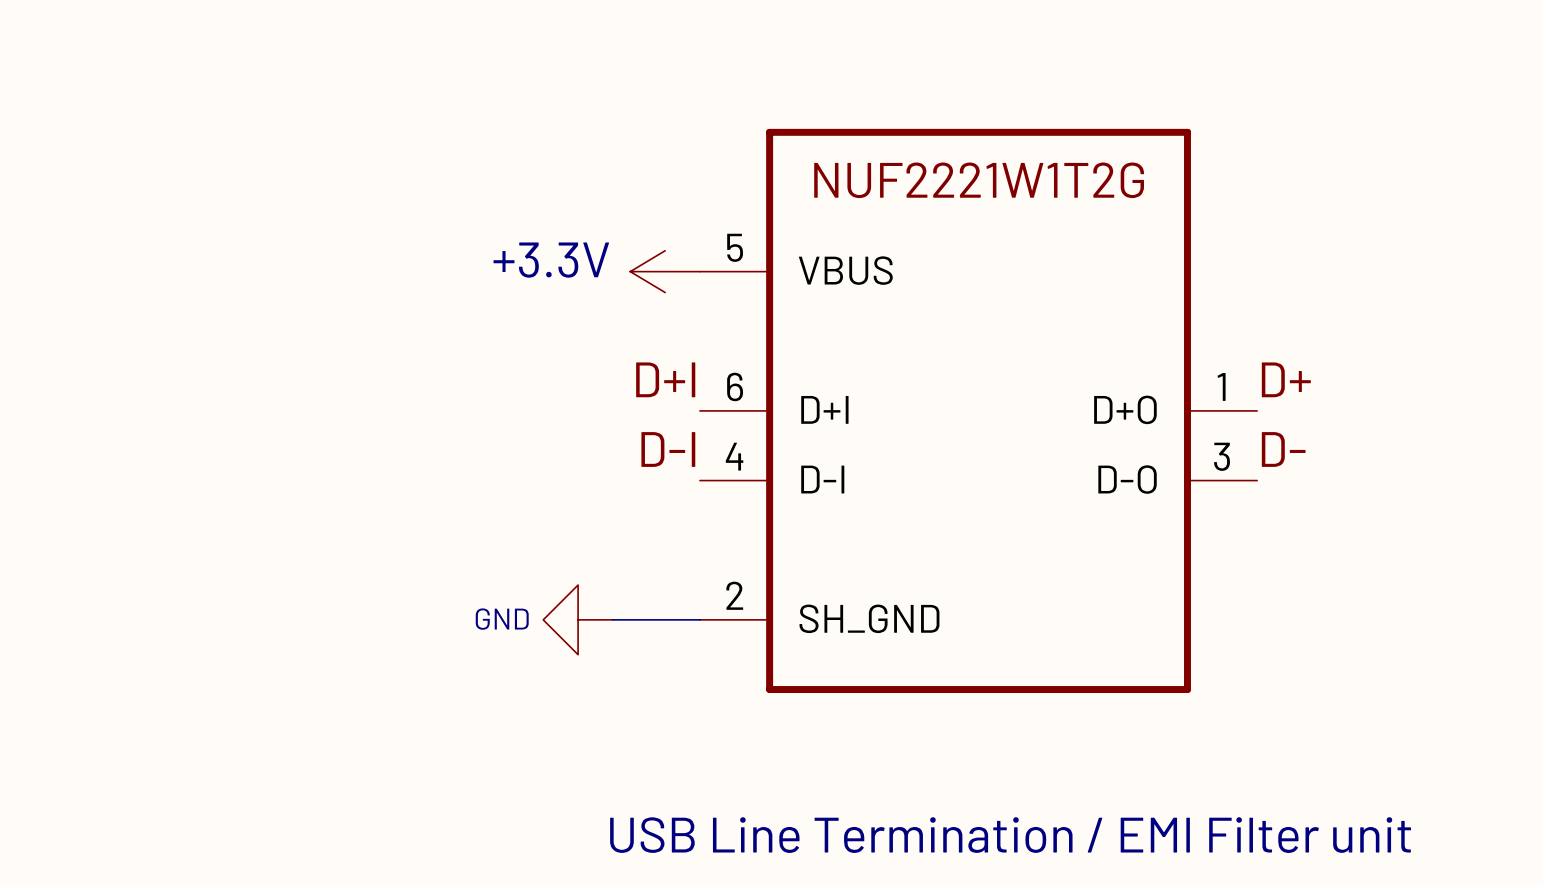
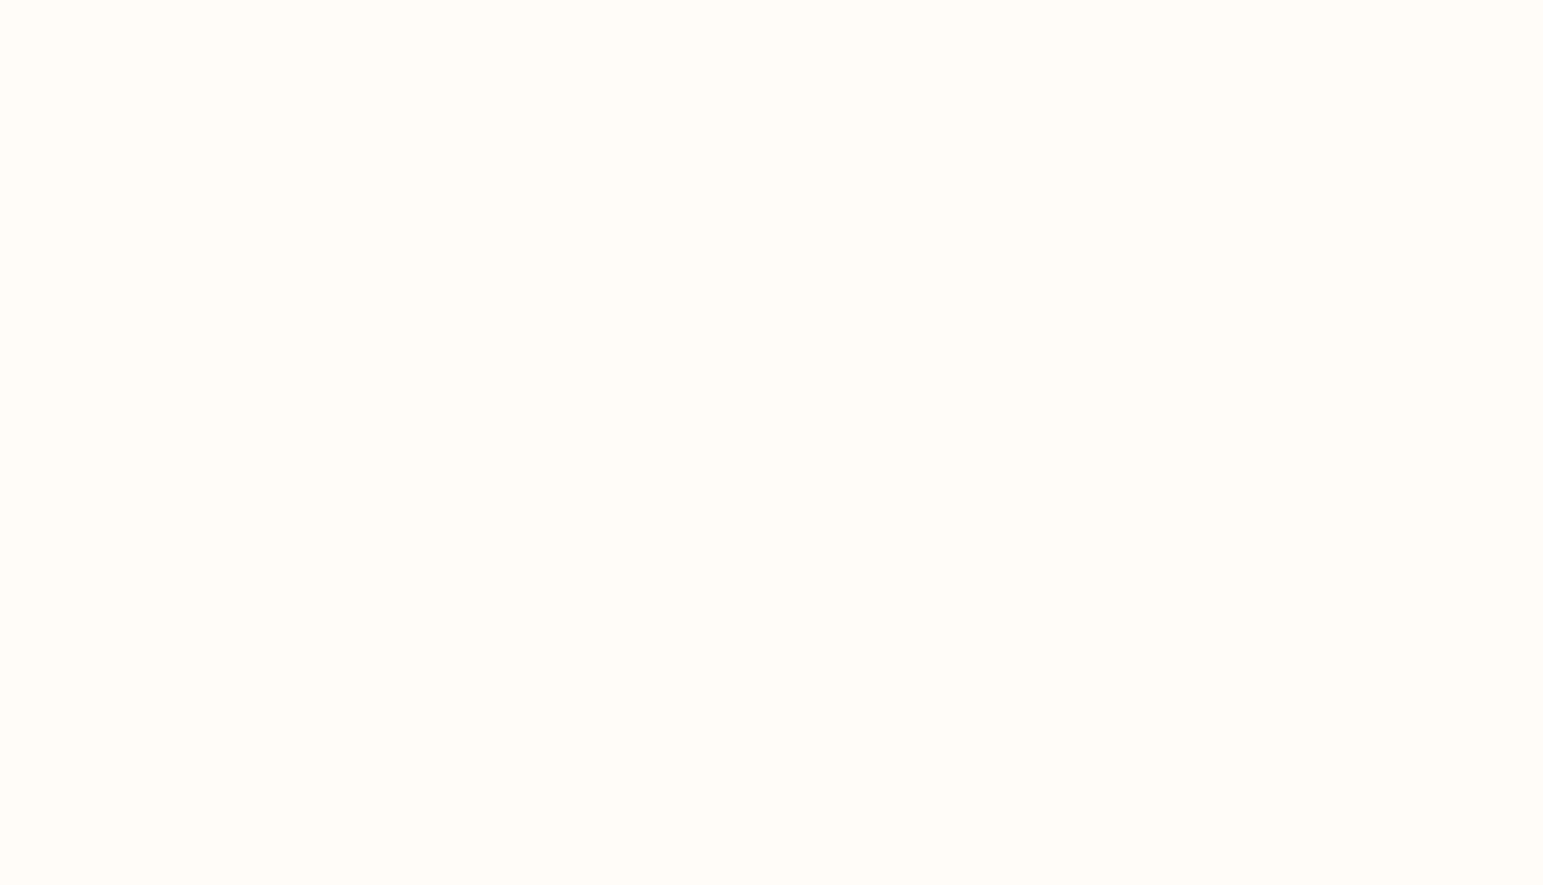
power symbol: +3.3V (665, 271) -> none
label: D+I (665, 379) -> none
label: D+ (1286, 379) -> none
part: (978, 410) -> none
label: D-I (668, 449) -> none
label: D- (1283, 449) -> none
power symbol: GND (578, 619) -> none
wire: (612, 619) (699, 619) -> none
text: USB Line Termination / EMI Filter unit (1010, 835) -> none

